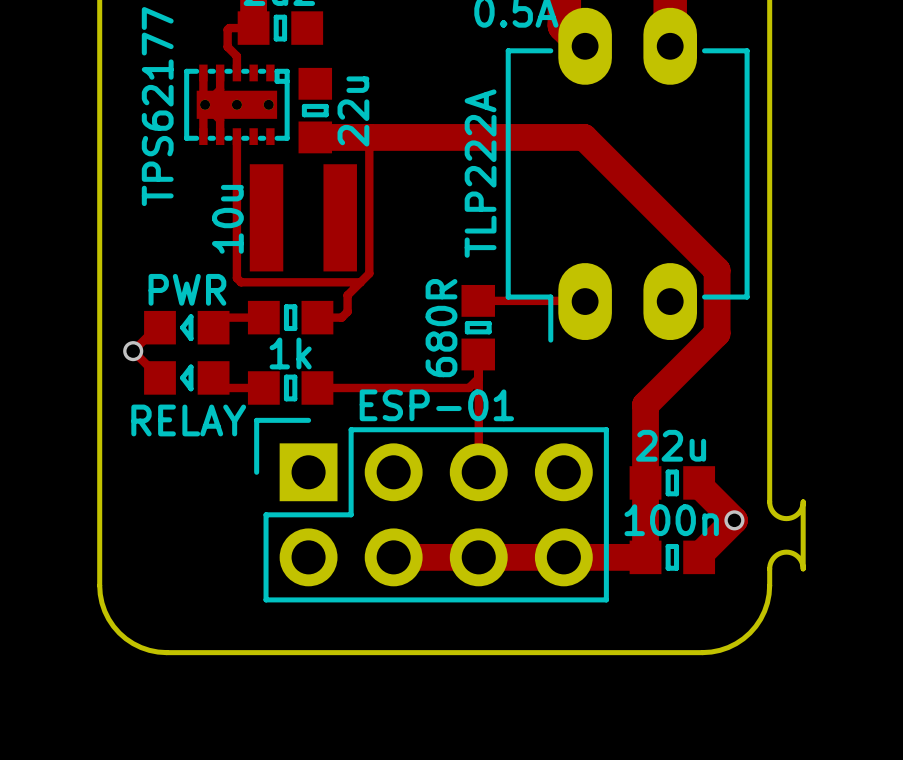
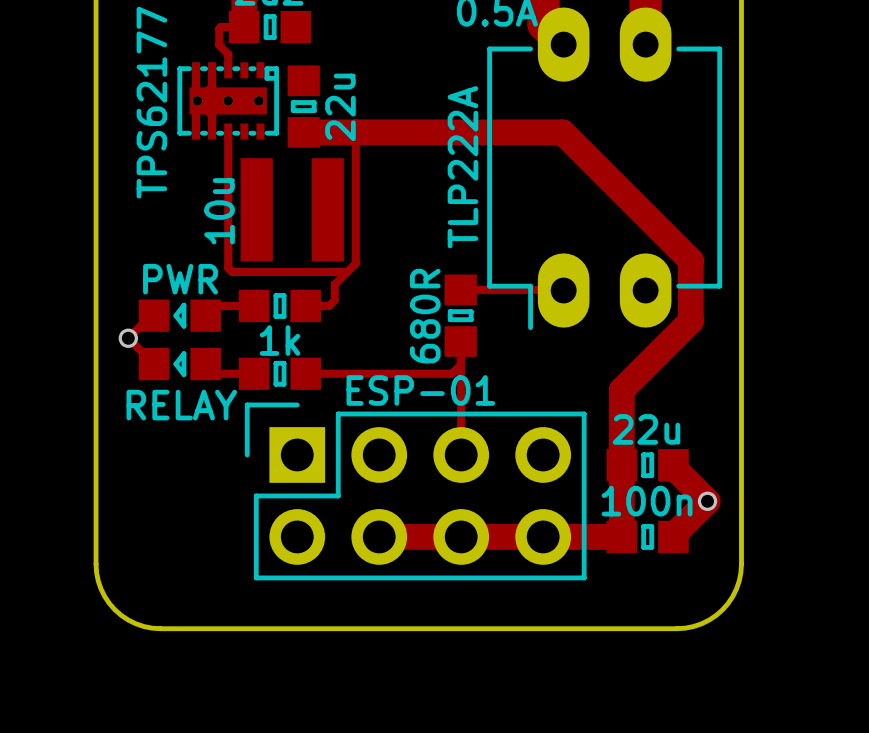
board edge: (769, 501) (774, 513) (786, 518) (798, 513) (803, 501) (803, 568) (798, 557) (786, 552) (774, 557) (769, 568) -> (741, 483) (741, 548)

